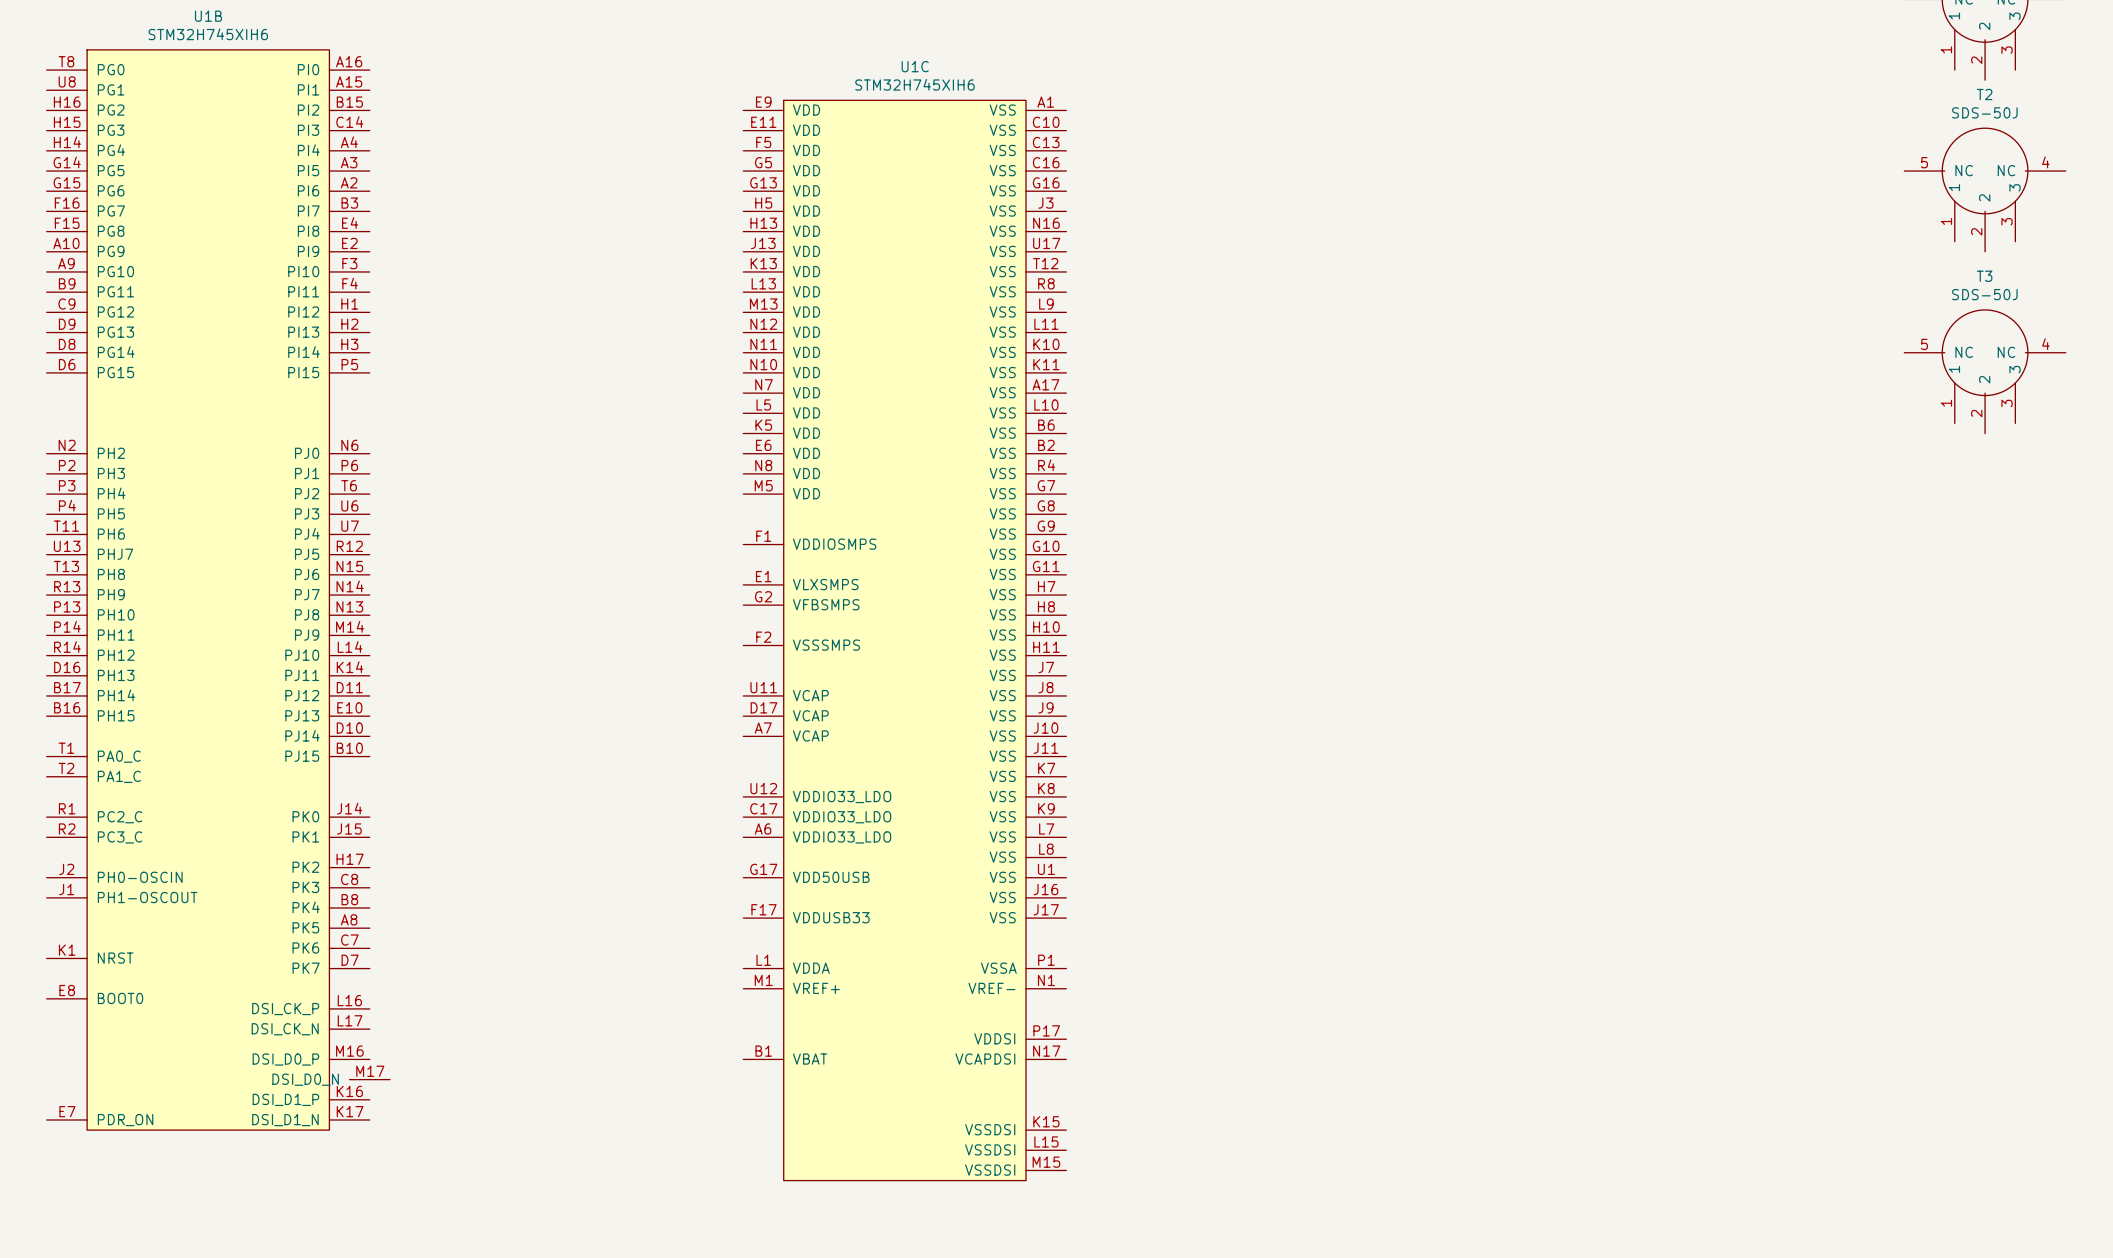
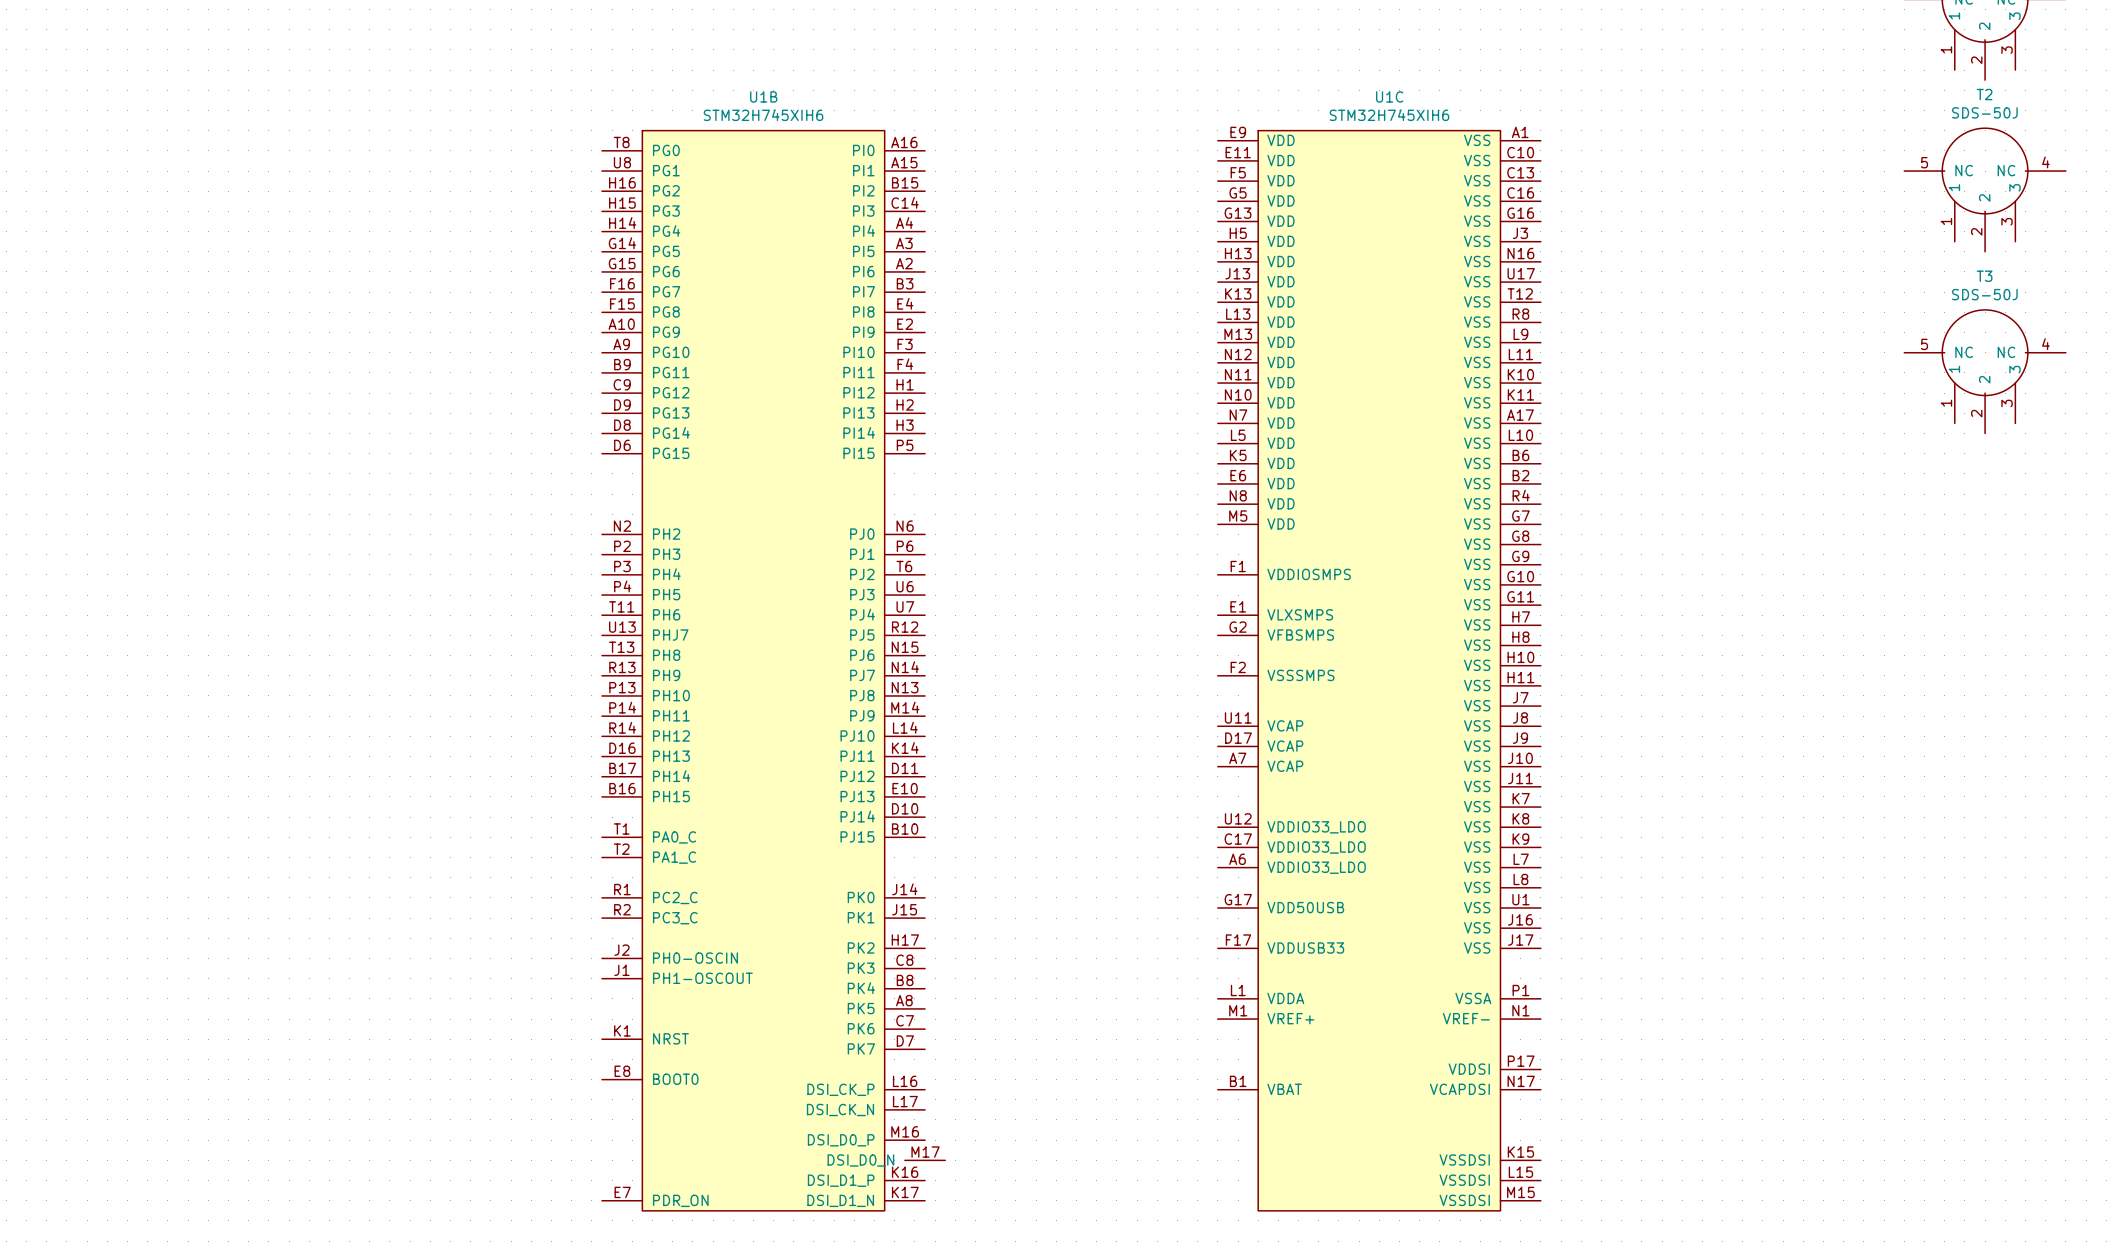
U1B position: (218, 589) -> (773, 670)
U1C position: (904, 640) -> (1379, 670)

